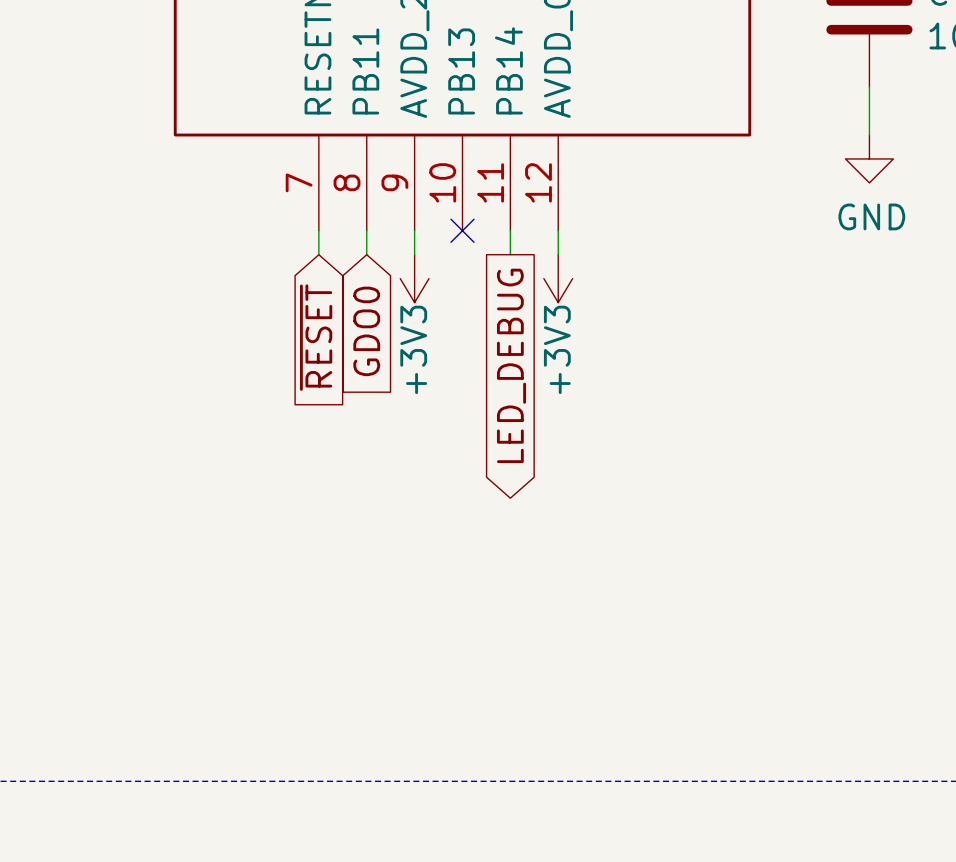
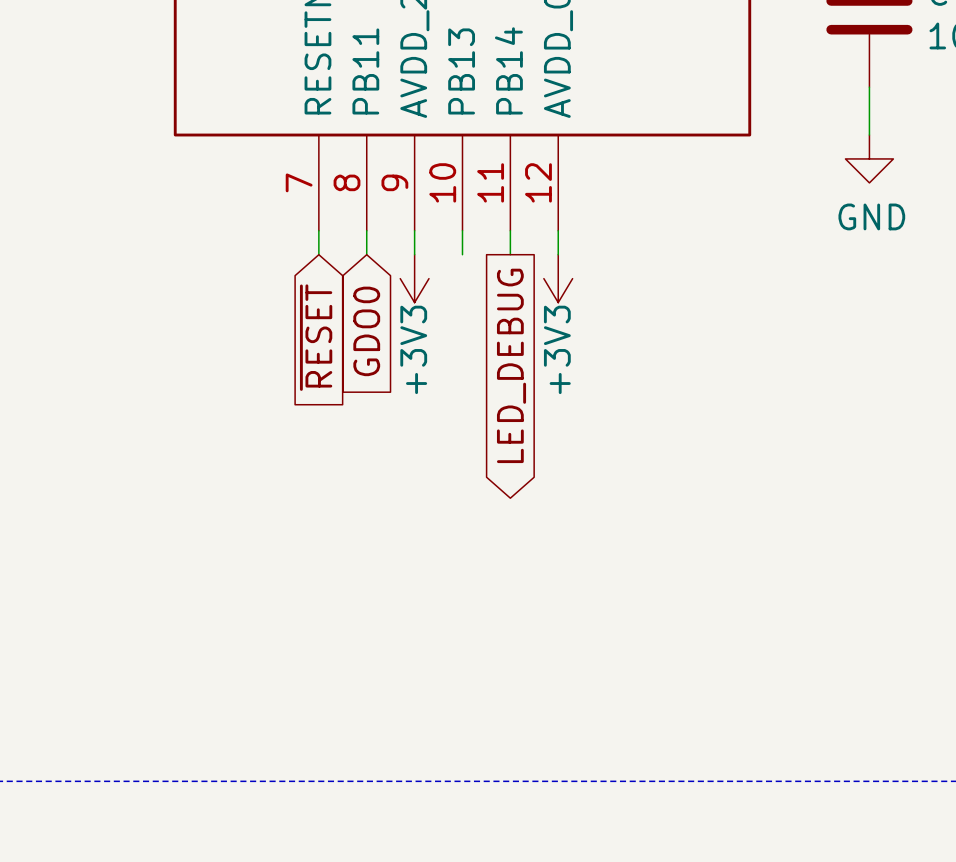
wire: none -> (462, 230) (462, 254)
no-connect mark: (462, 230) -> none

